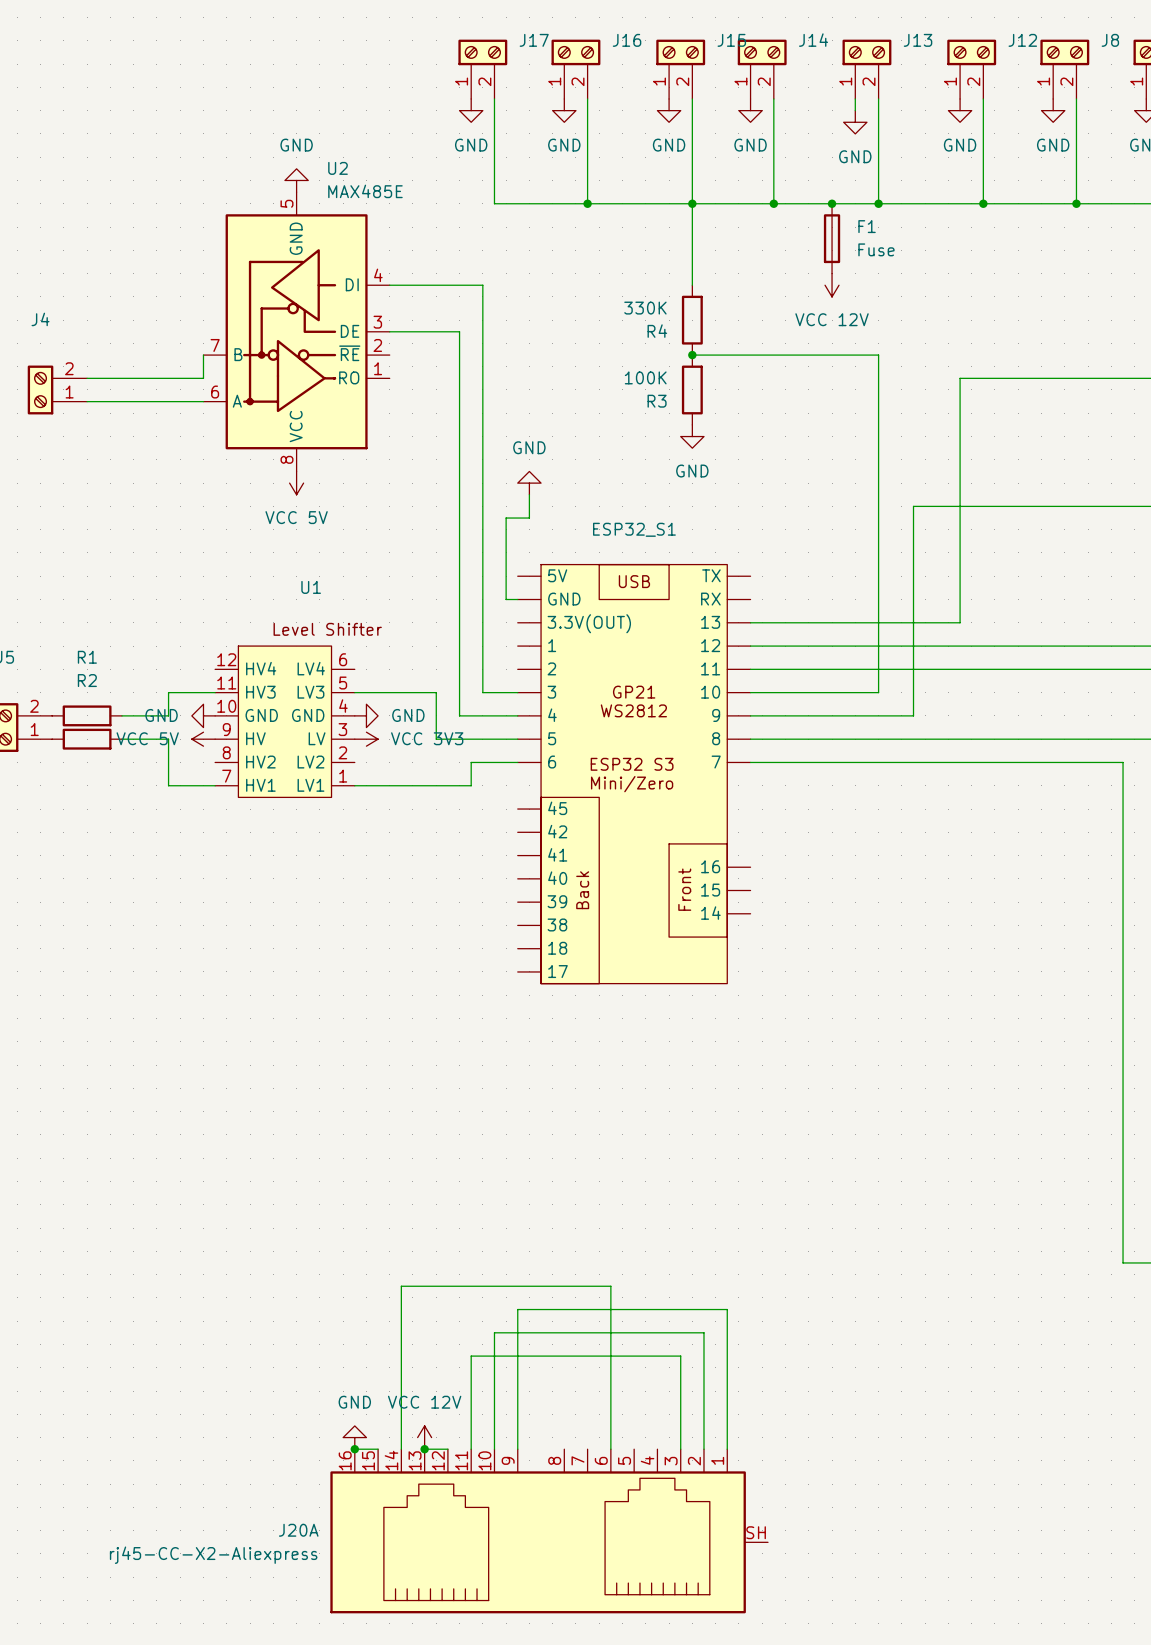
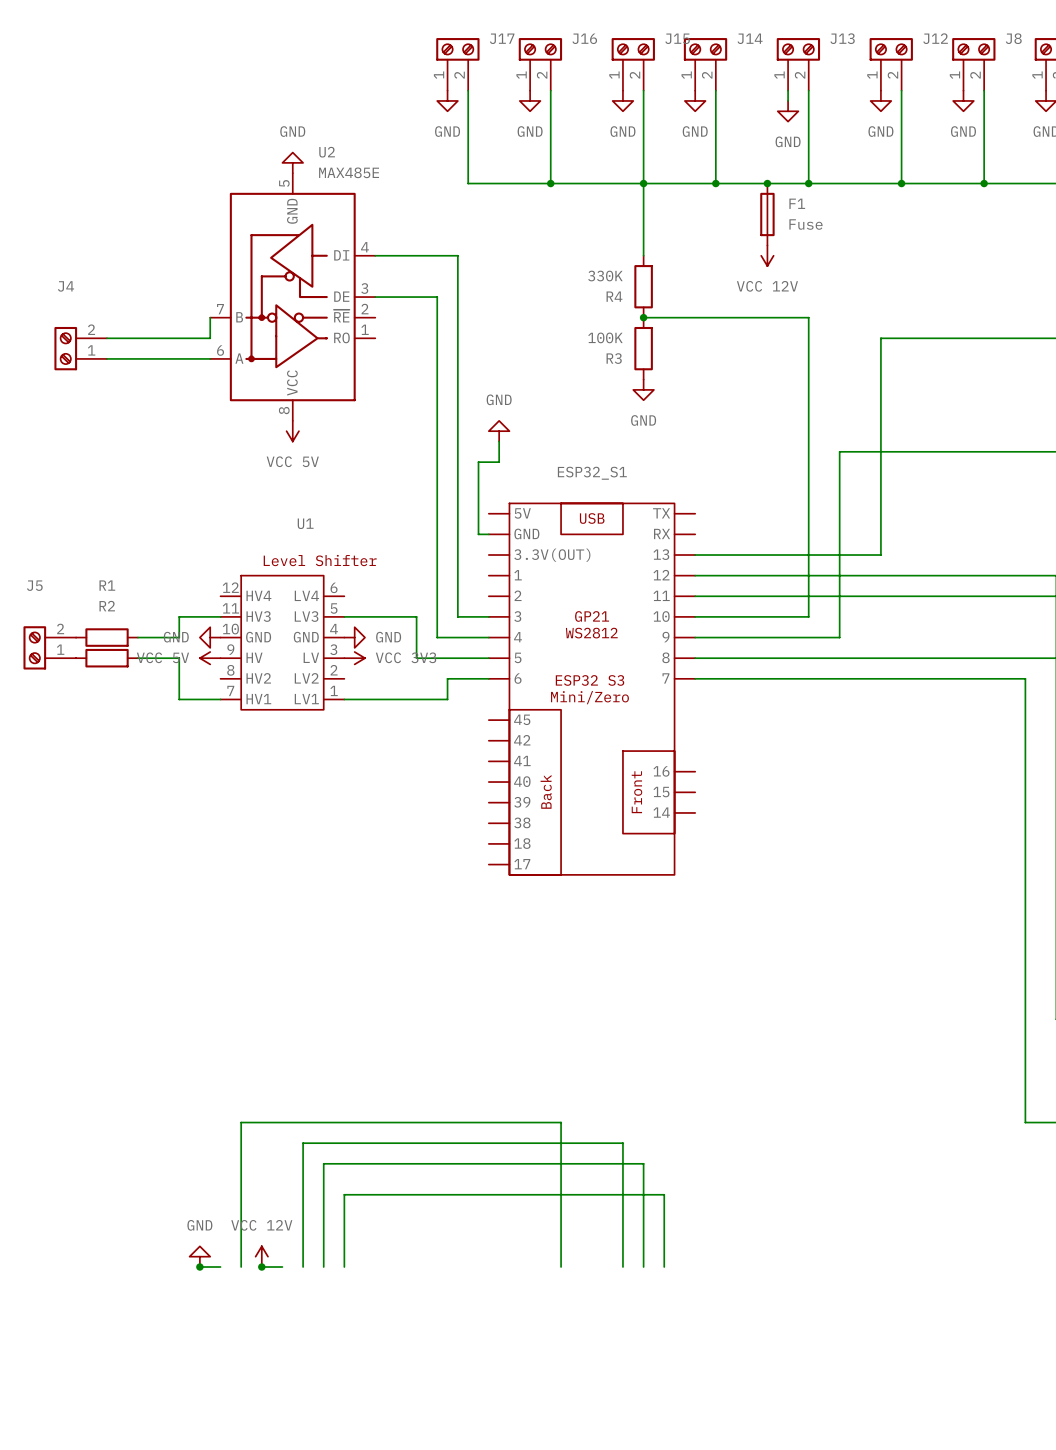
wire: (401, 1286) (401, 1449) -> (385, 1143) (303, 1143) (303, 1267)
wire: (610, 1286) (610, 1449) -> (571, 1143) (622, 1143) (622, 1267)
wire: (517, 1309) (517, 1449) -> (488, 1163) (323, 1163) (323, 1267)
wire: (692, 1309) (727, 1309) (727, 1449) -> (643, 1163) (643, 1267)
junction: none -> (199, 1267)
wire: none -> (241, 1267) (241, 1122) (561, 1122) (561, 1267)
junction: none -> (261, 1267)
wire: none -> (344, 1267) (344, 1194) (664, 1194) (664, 1267)
power symbol position: GND (354, 1437) -> GND (199, 1256)
power symbol position: VCC 12V (424, 1437) -> VCC 12V (261, 1256)
wire: (354, 1449) (378, 1449) -> (199, 1267) (220, 1267)
junction: (354, 1449) -> none
wire: (424, 1449) (447, 1449) -> (261, 1267) (282, 1267)
junction: (424, 1449) -> none
wire: (471, 1449) (471, 1356) (680, 1356) (680, 1449) -> none
wire: (494, 1449) (494, 1332) (703, 1332) (703, 1449) -> none
J20A: rj45-CC-X2-Aliexpress (549, 1531) -> none

